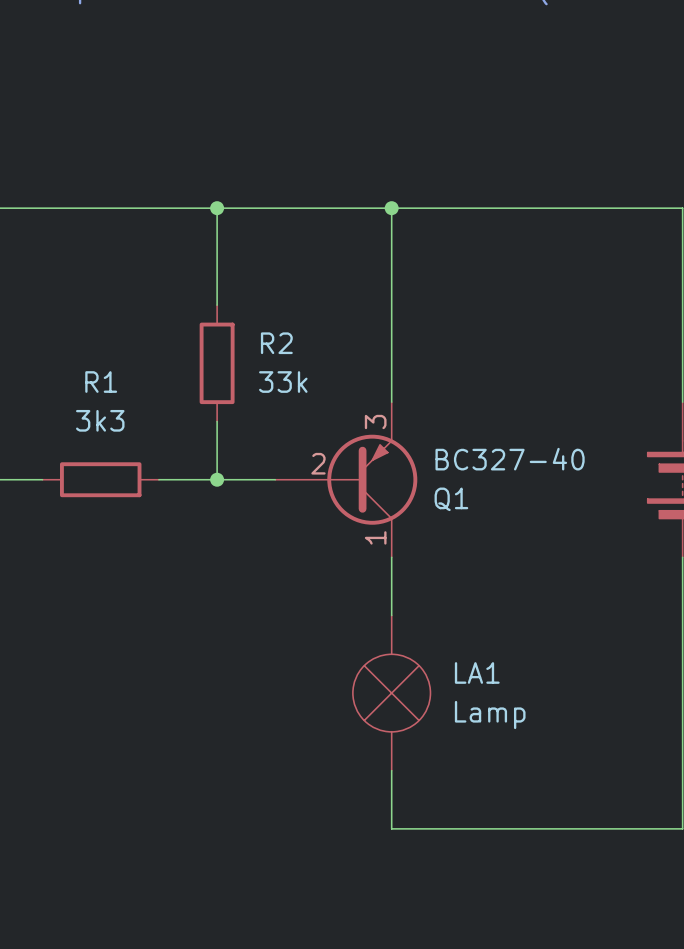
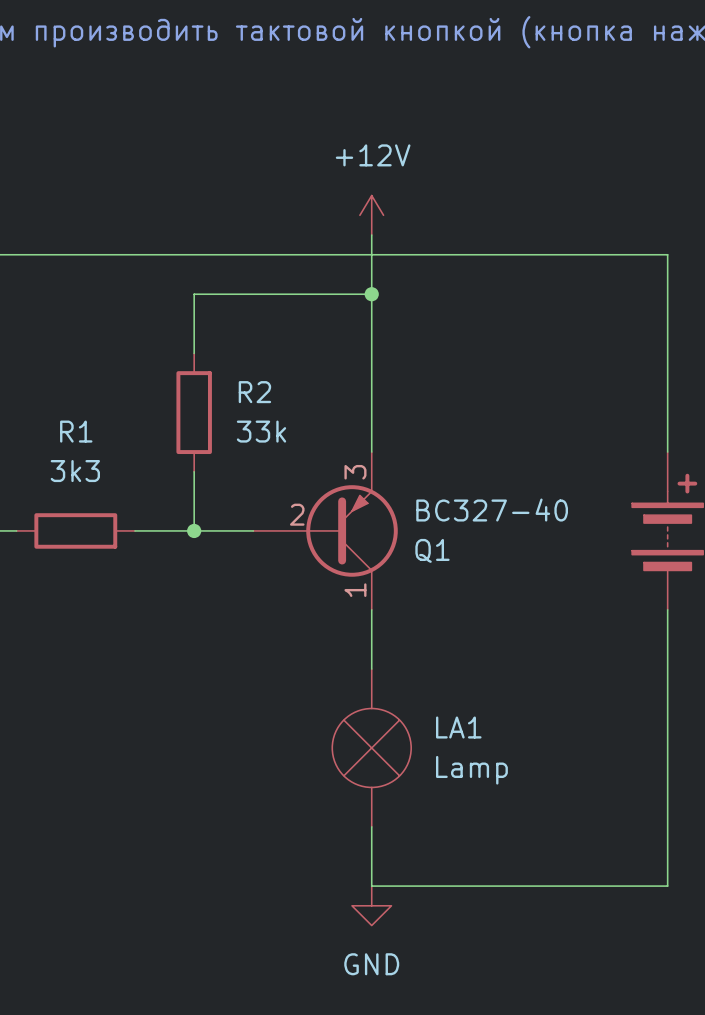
power symbol: none -> +12V (371, 215)
wire: none -> (371, 235) (371, 254)
wire: (217, 208) (217, 246) -> (371, 294) (194, 294)
junction: (217, 208) -> none
junction position: (391, 208) -> (371, 294)
power symbol: none -> GND (371, 905)

